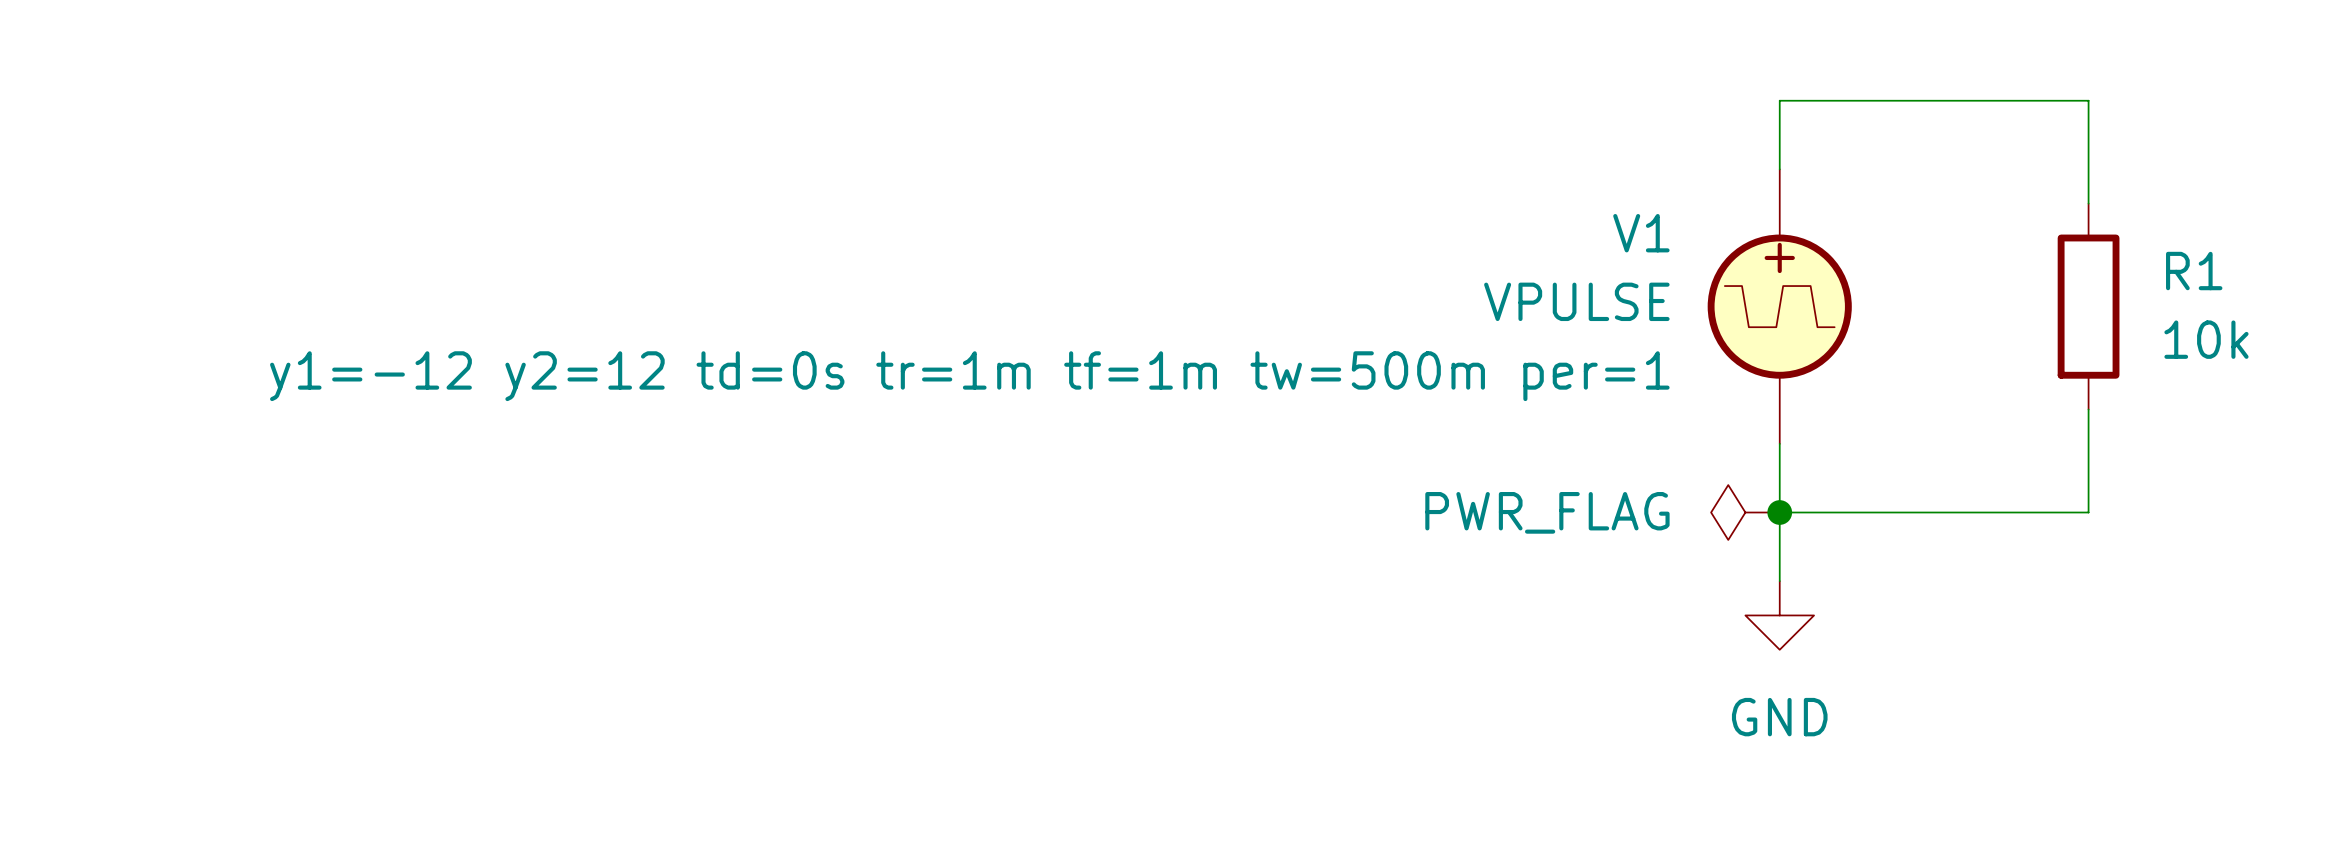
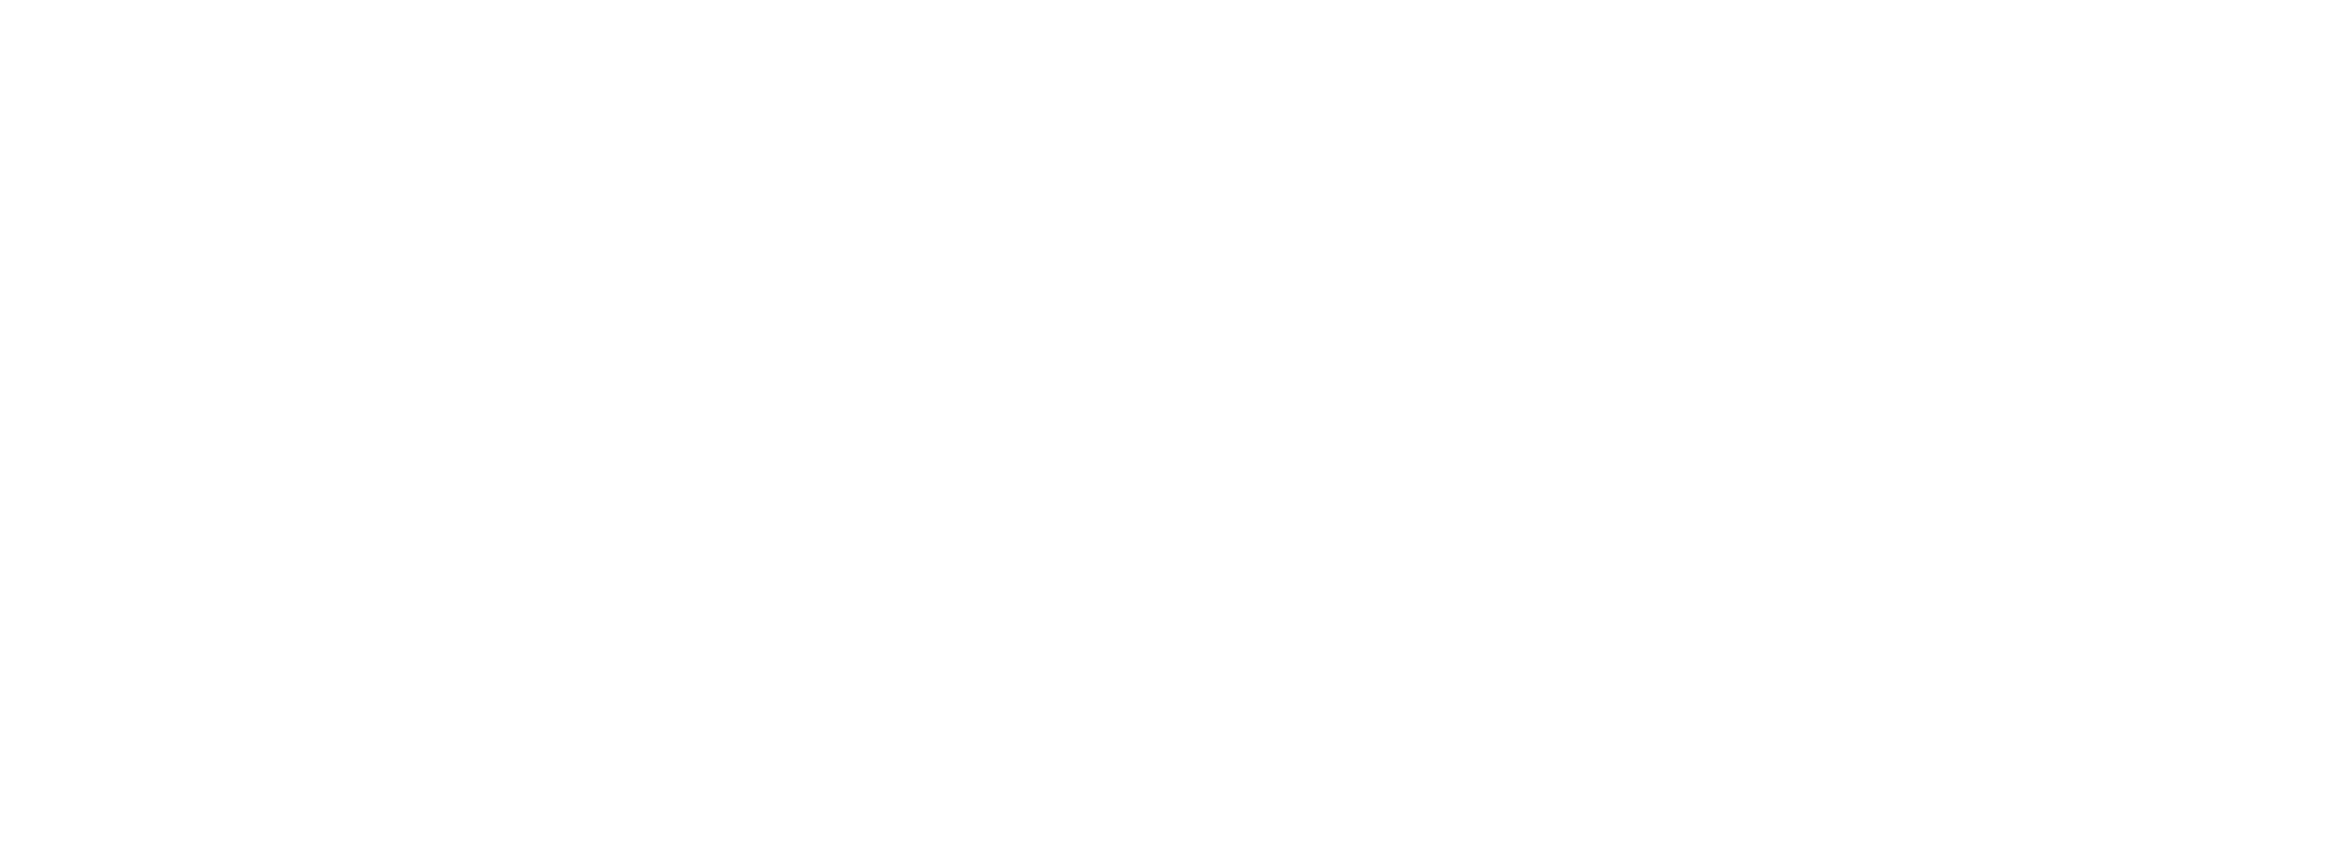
wire: (1779, 169) (1779, 100) (2088, 100) (2088, 203) -> none
V1: VPULSE (1779, 306) -> none
R1: 10k (2088, 306) -> none
wire: (2088, 409) (2088, 512) (1779, 512) -> none
wire: (1779, 443) (1779, 581) -> none
power symbol: PWR_FLAG (1745, 512) -> none
junction: (1779, 512) -> none
power symbol: GND (1779, 615) -> none

